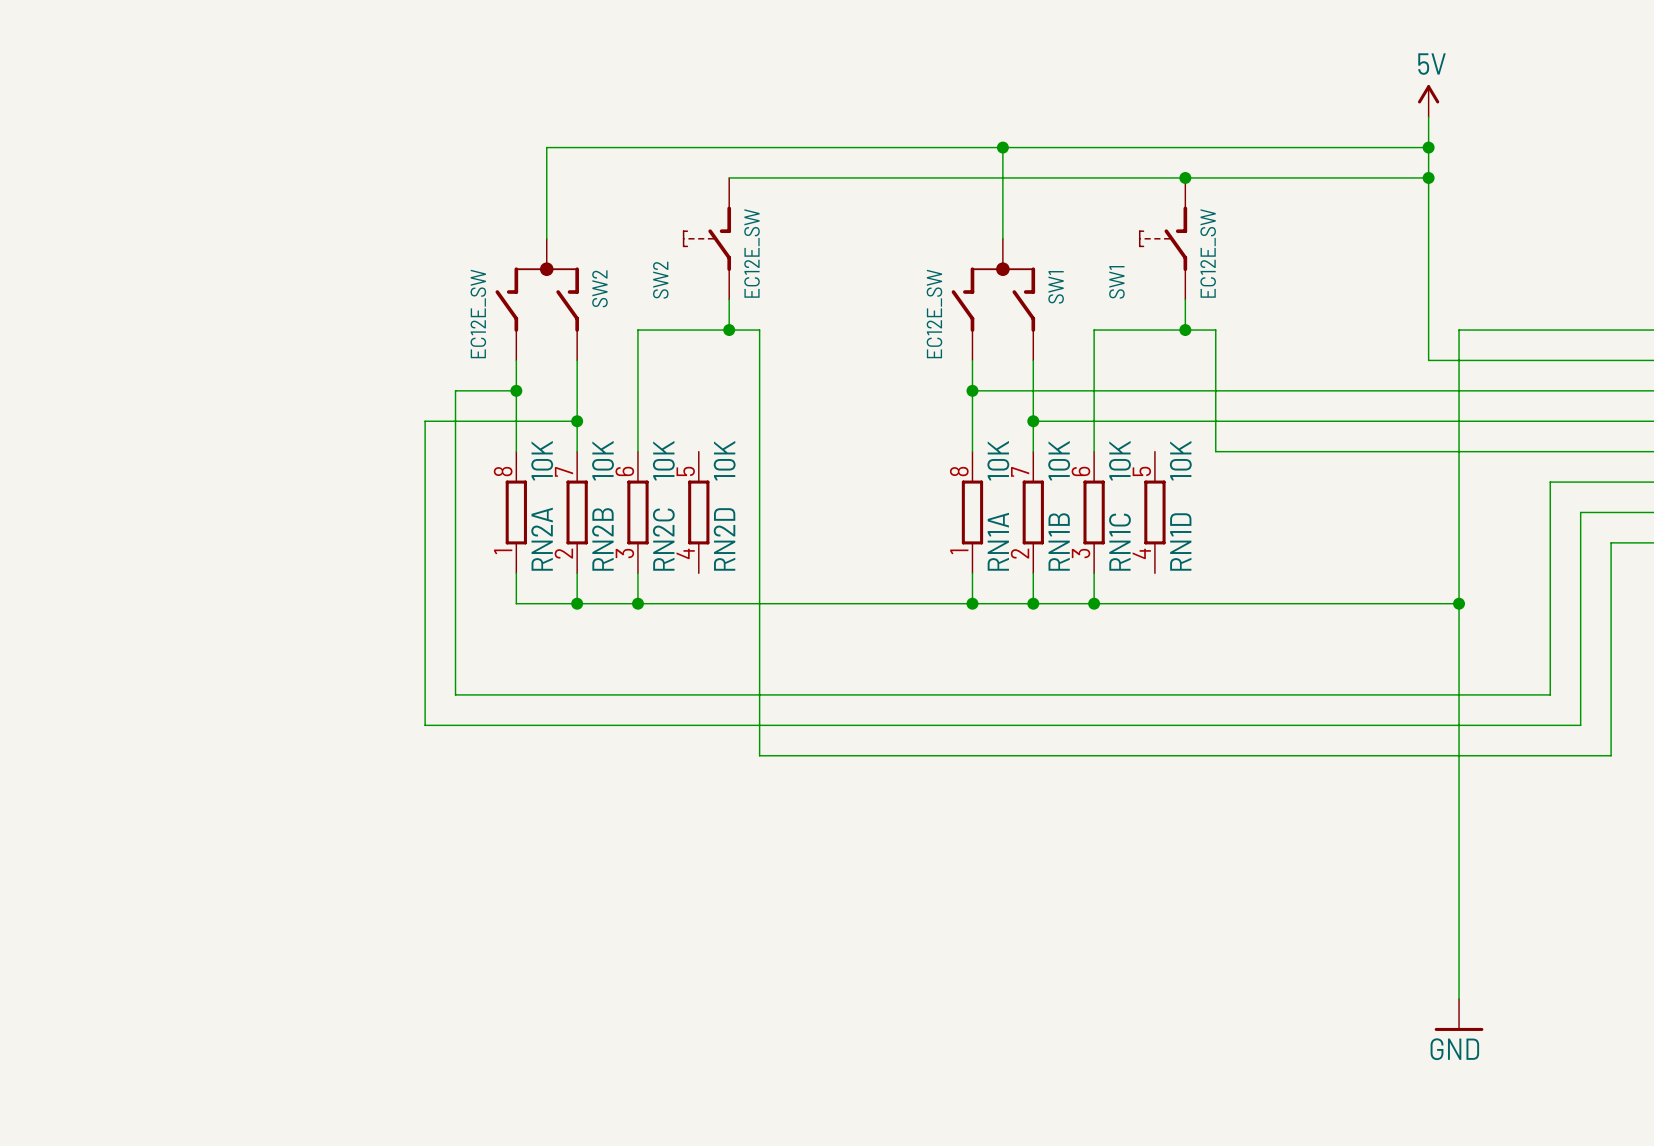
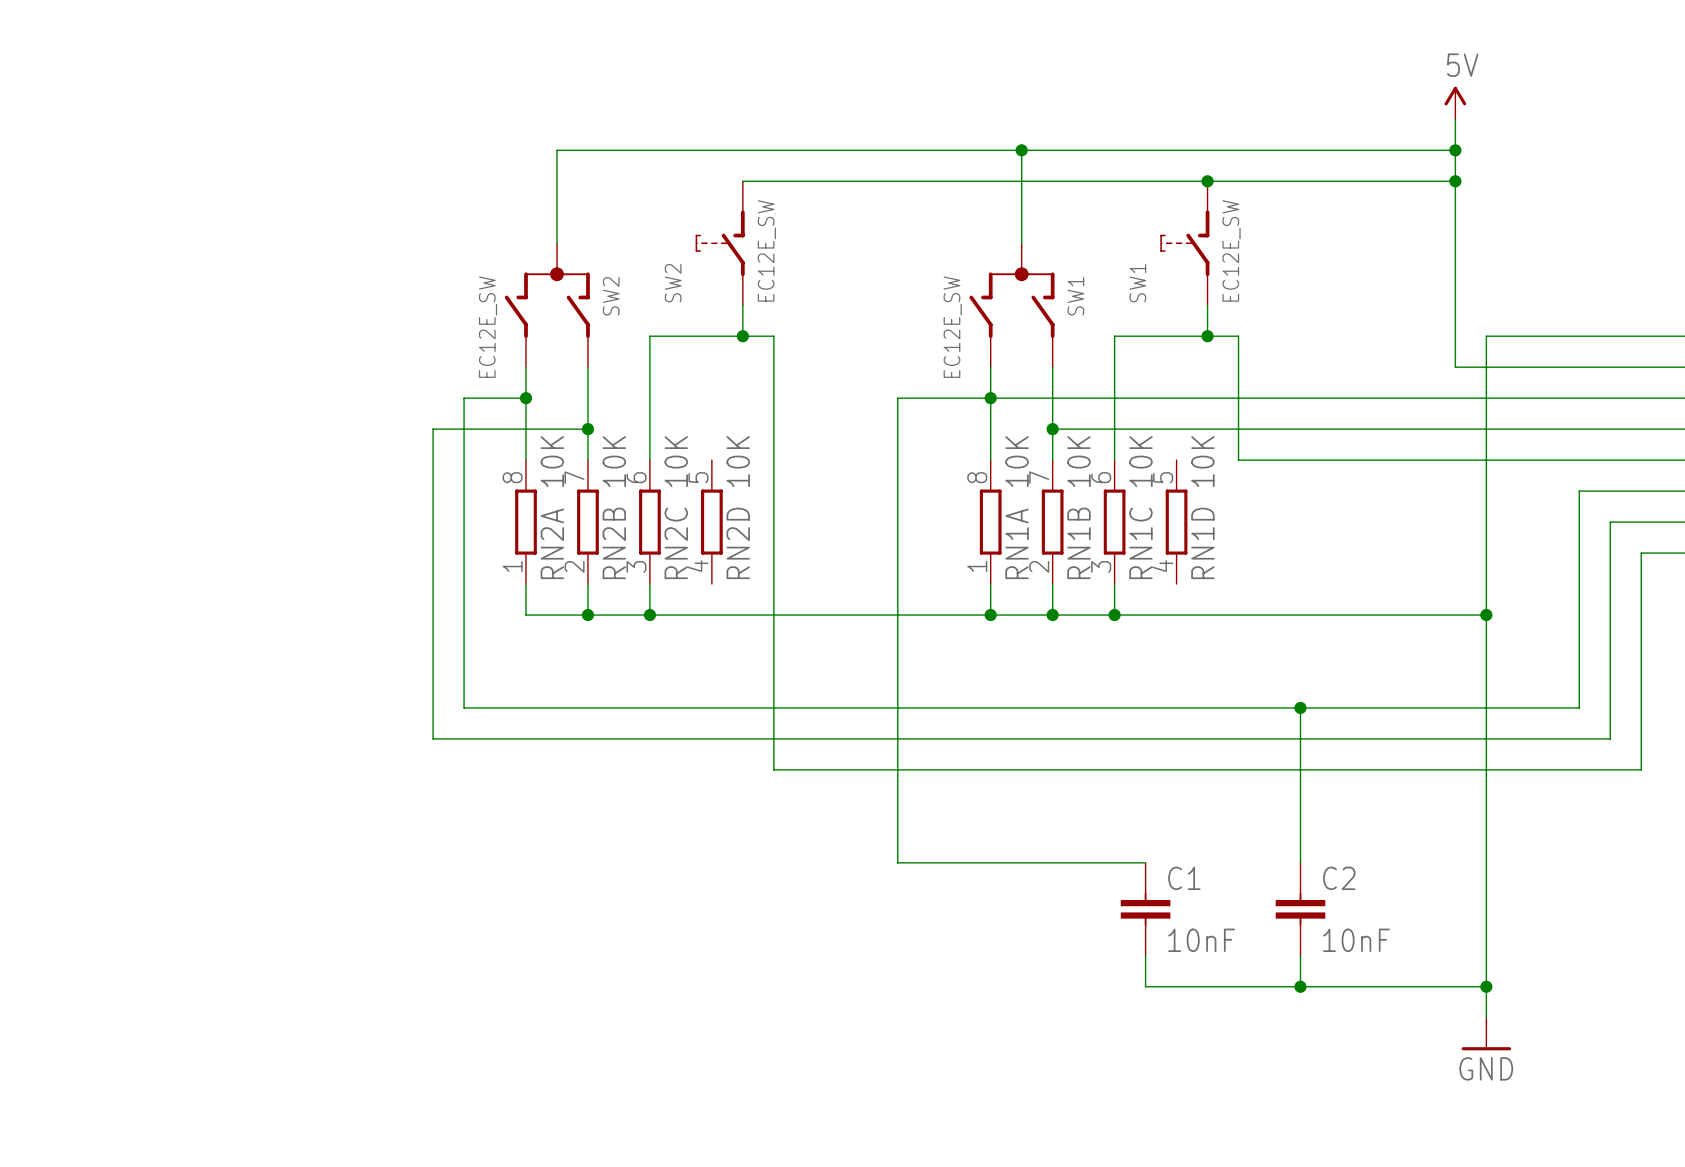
wire: none -> (990, 398) (897, 398) (897, 862) (1145, 862)
wire: none -> (1300, 707) (1300, 862)
junction: none -> (1300, 707)
C1: none -> 10nF (1145, 909)
C2: none -> 10nF (1300, 909)
wire: none -> (1145, 955) (1145, 986) (1486, 986)
wire: none -> (1300, 955) (1300, 986)
junction: none -> (1300, 986)
junction: none -> (1486, 986)

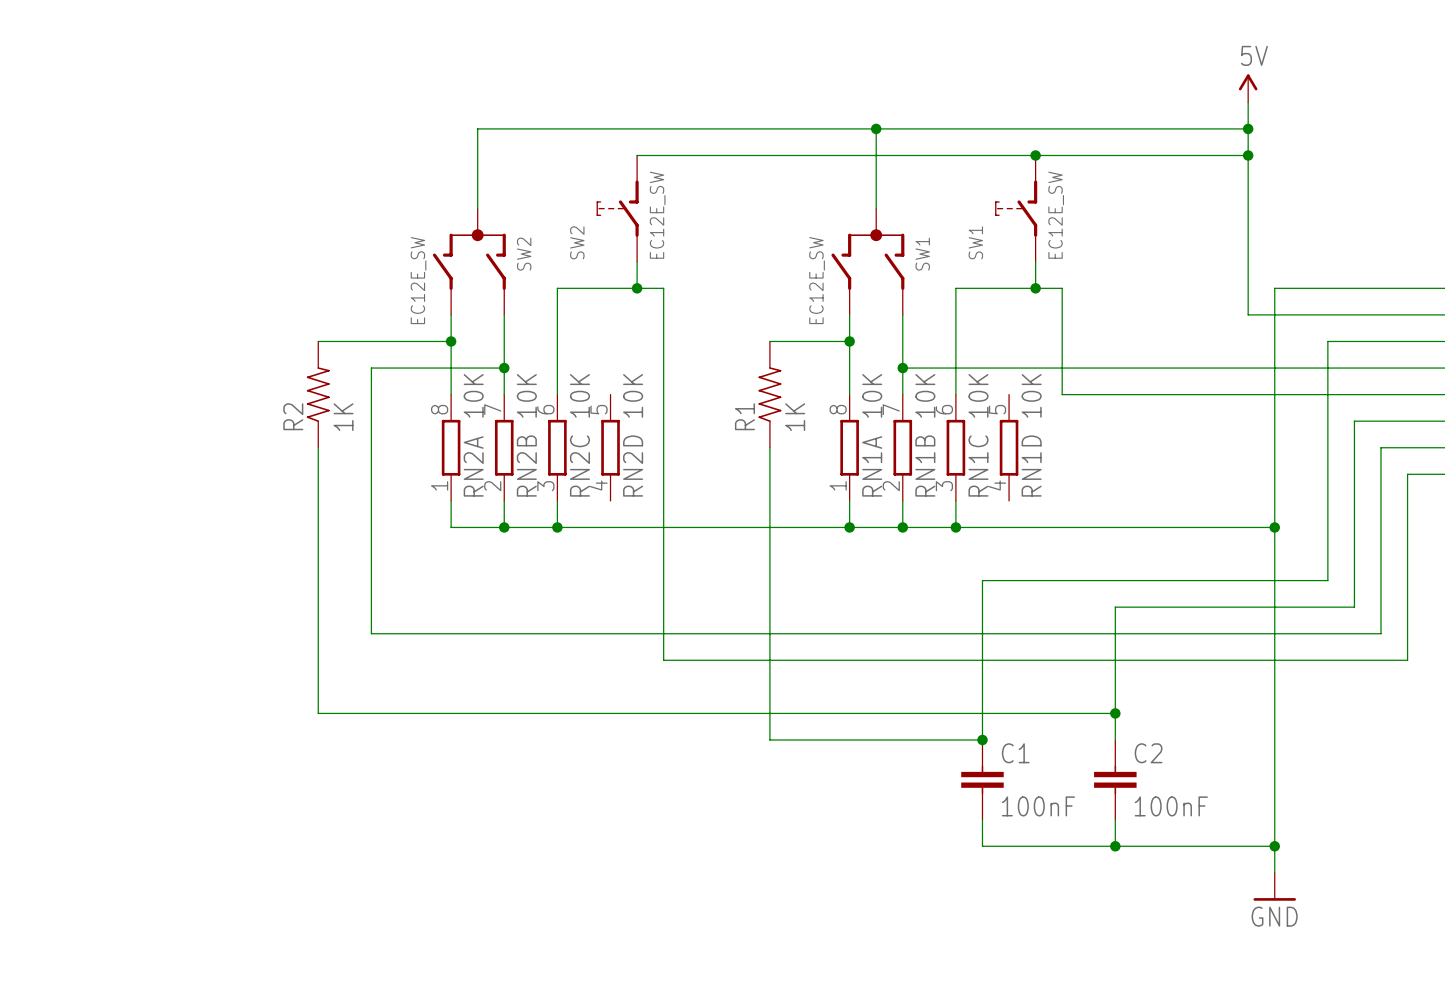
wire: (464, 398) (464, 707) (1300, 707) -> (397, 341) (318, 341)
wire: (990, 398) (1548, 398) -> (982, 740) (982, 580) (1327, 580) (1327, 341)
R2: none -> 1K (318, 394)
R1: none -> 1K (769, 394)
wire: none -> (318, 447) (318, 713) (1115, 713)
junction: (1300, 707) -> none
junction: none -> (1115, 713)
junction: none -> (982, 740)
C1 value: 10nF (1201, 940) -> 100nF (1038, 806)
C2 value: 10nF (1356, 940) -> 100nF (1171, 806)

